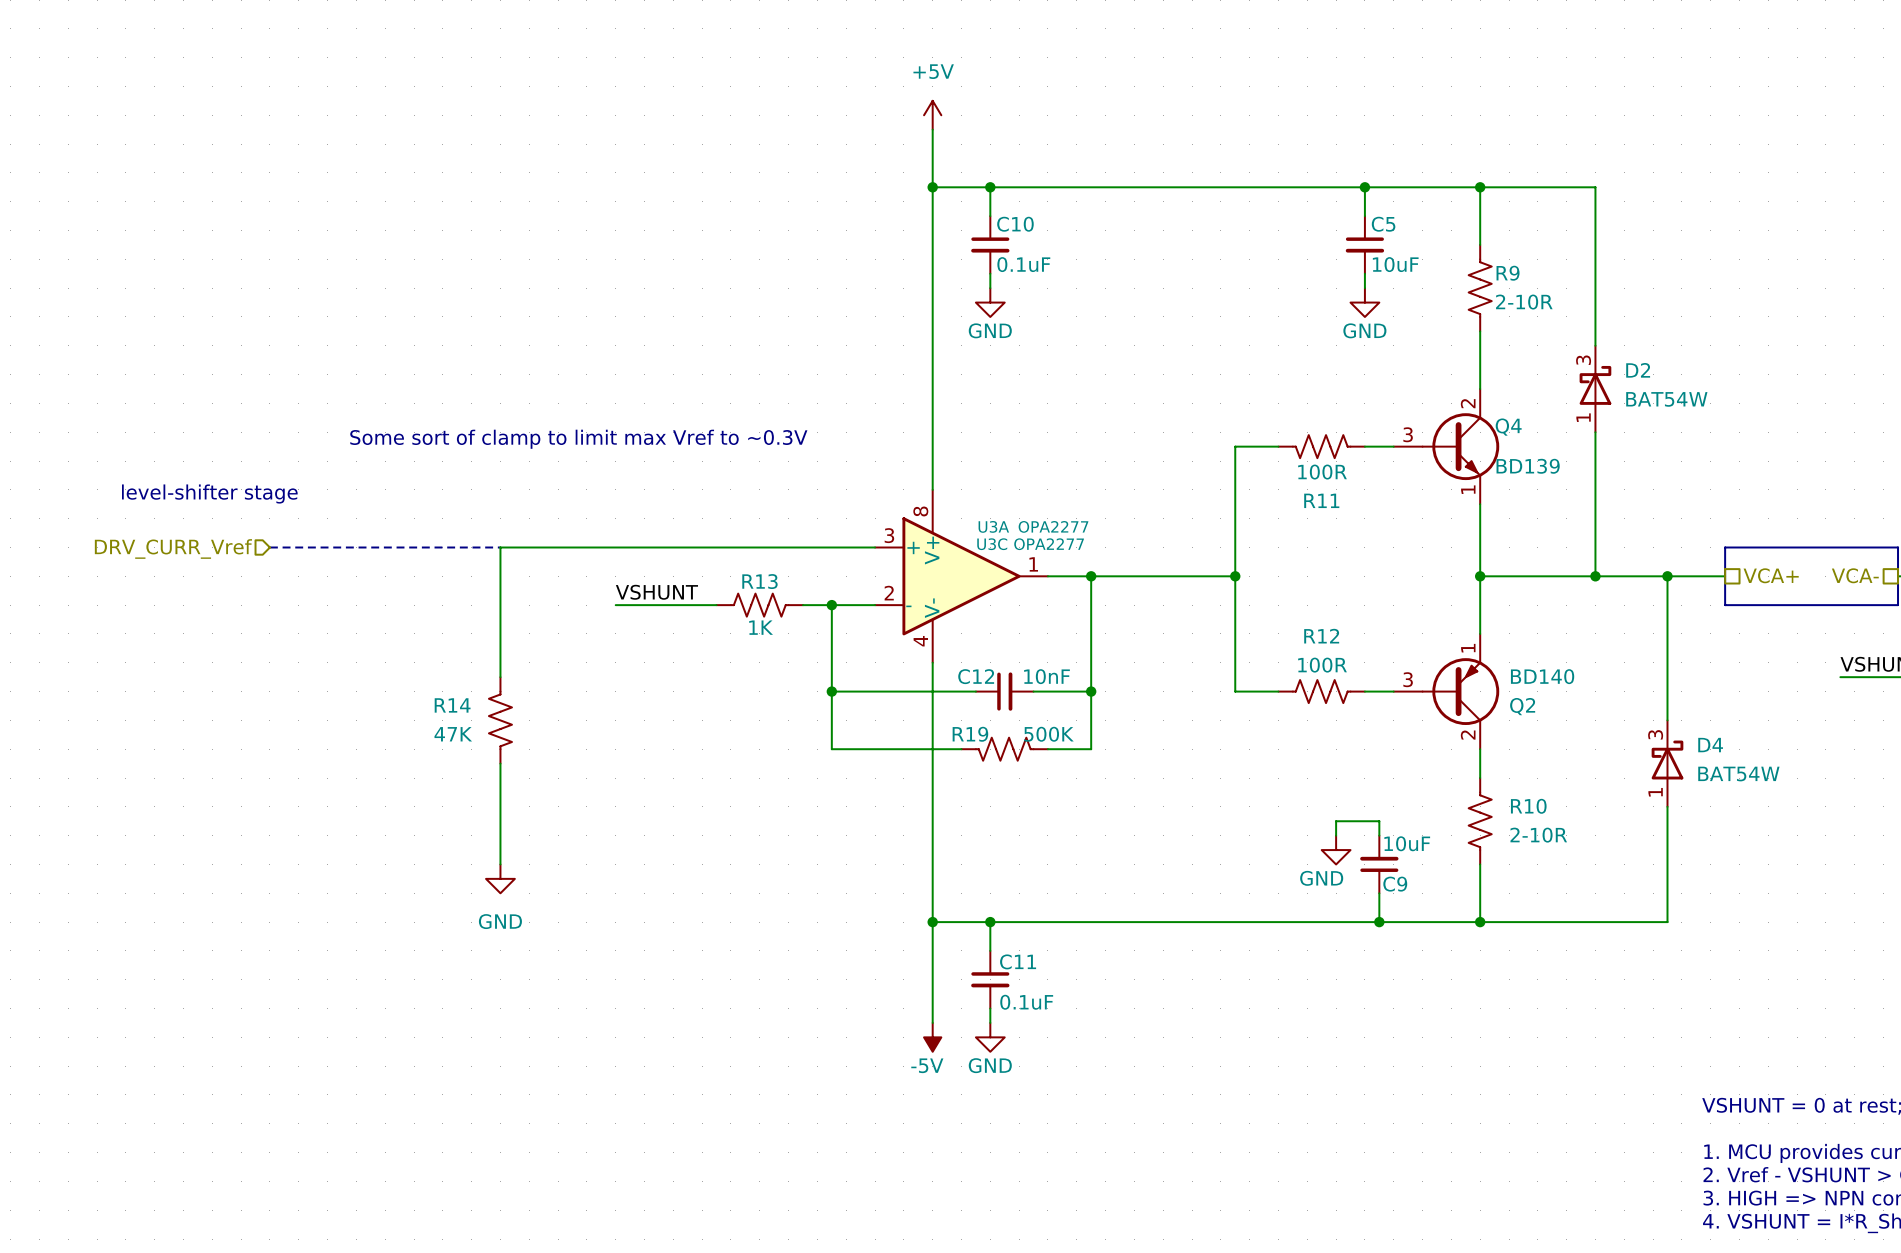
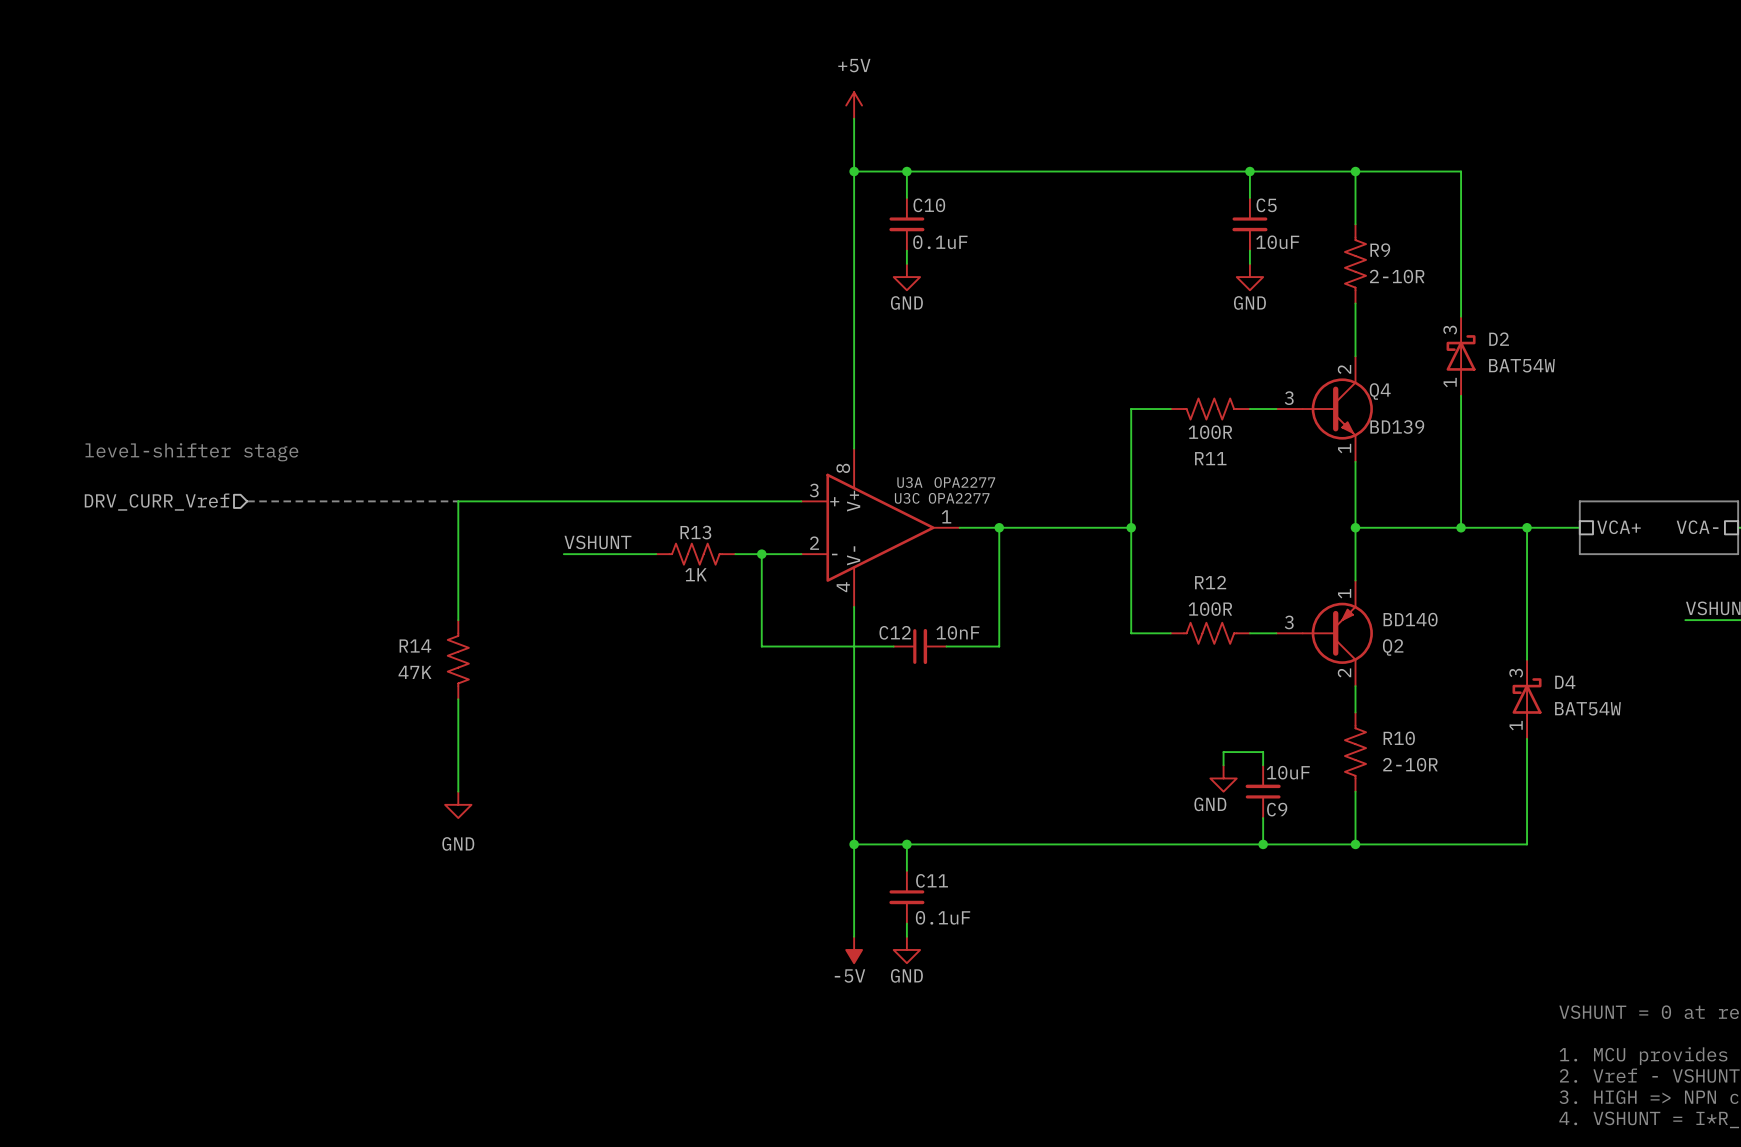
text: Some sort of clamp to limit max Vref to ~0.3V (578, 439) -> none
wire: (831, 691) (975, 691) -> none
junction: (831, 691) -> none
C12 position: (1004, 691) -> (920, 646)
wire: (1033, 691) (1091, 691) -> none
junction: (1091, 691) -> none
wire: (831, 705) (831, 749) (961, 749) -> (761, 646) (893, 646)
wire: (1091, 705) (1091, 749) (1047, 749) -> (999, 646) (946, 646)
R19: 500K (1004, 749) -> none

